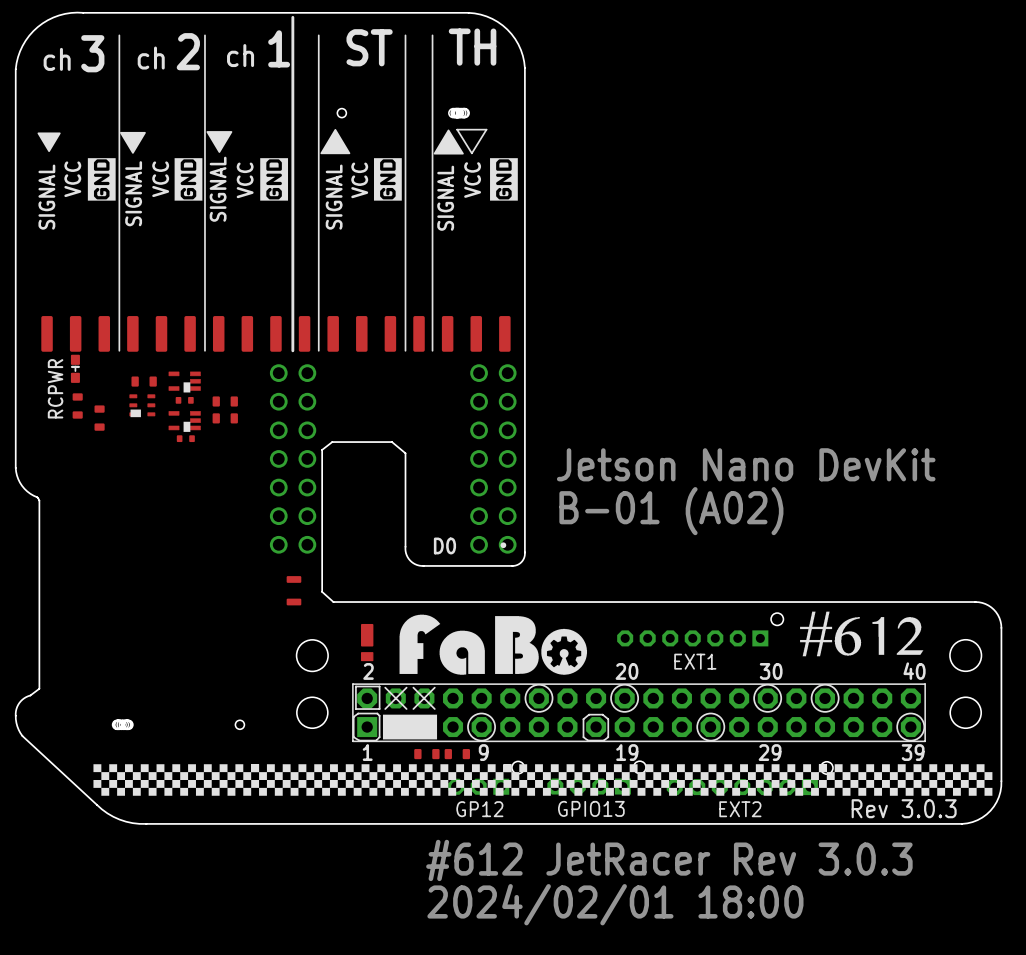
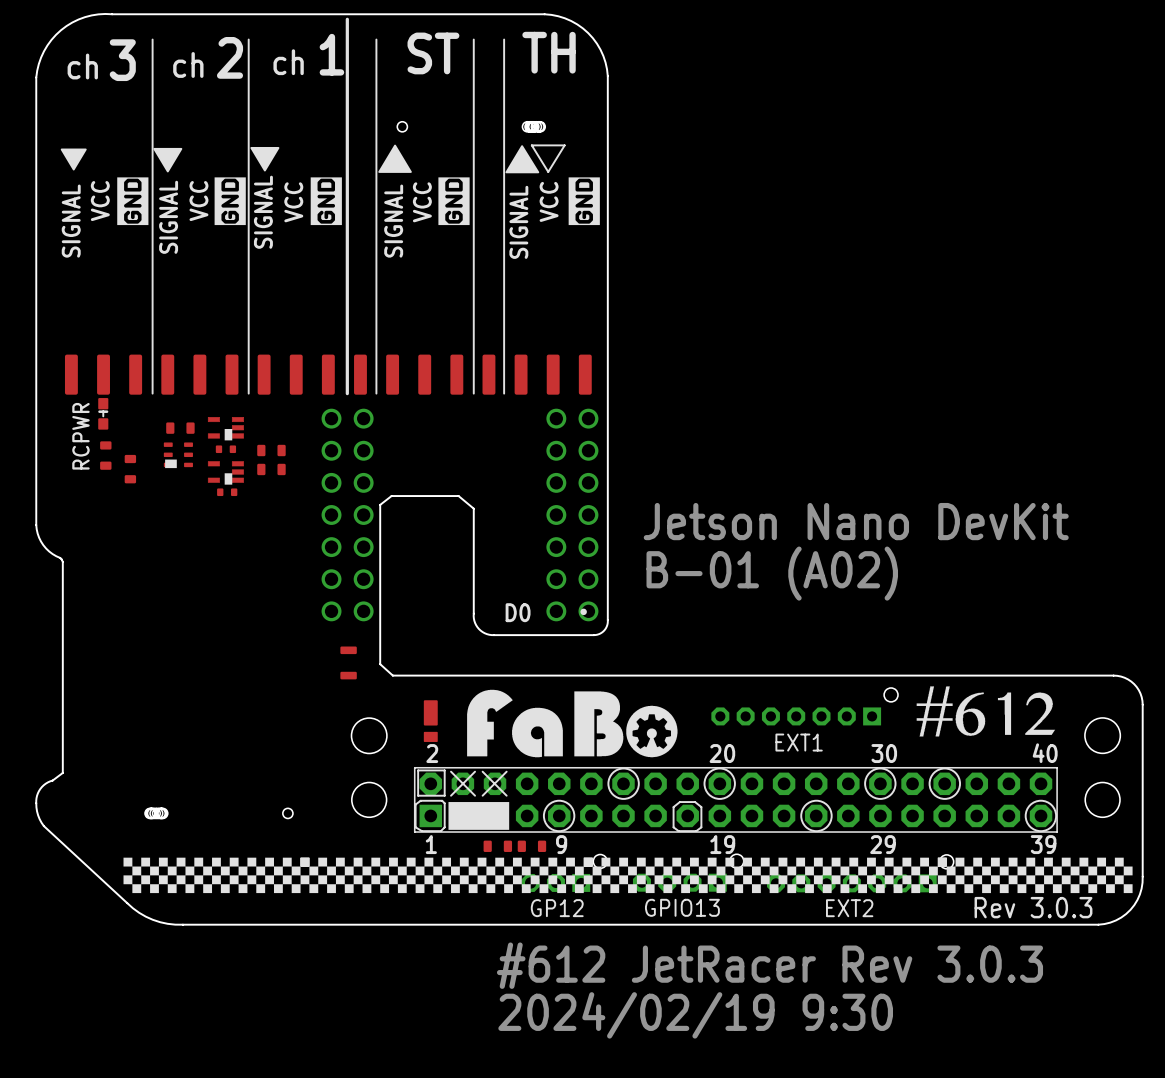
text: 2024/02/01 18:00 (615, 904) -> 2024/02/19 9:30 (695, 1015)

